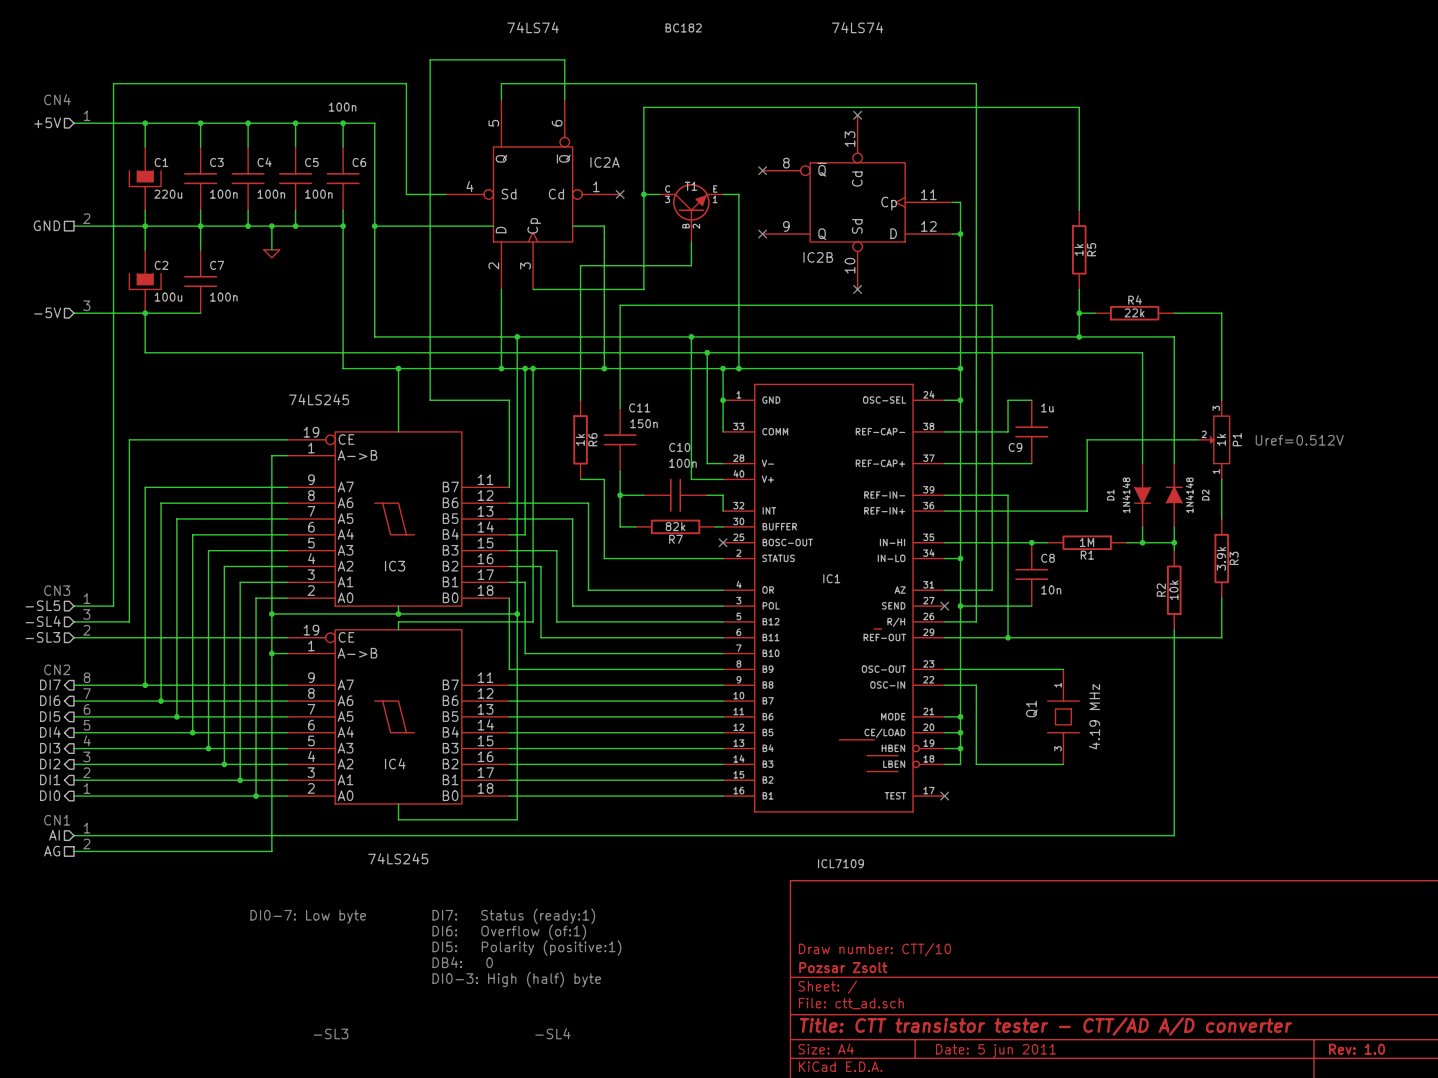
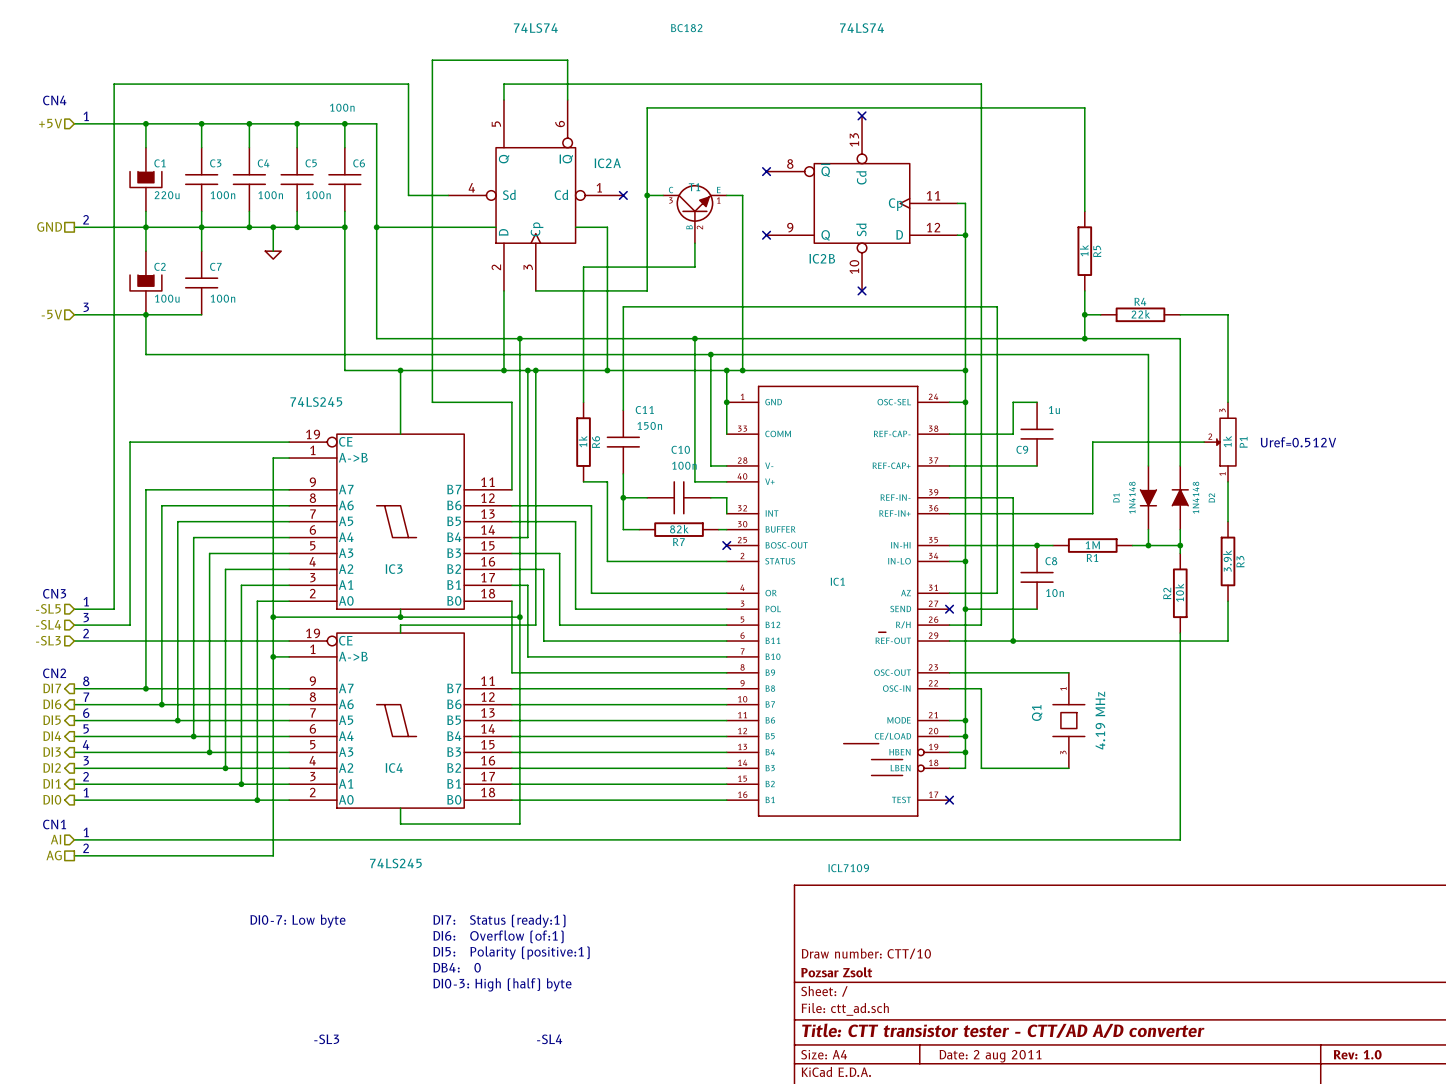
title block: Date: 5 jun 2011 (996, 1050) -> Date: 2 aug 2011 (990, 1056)

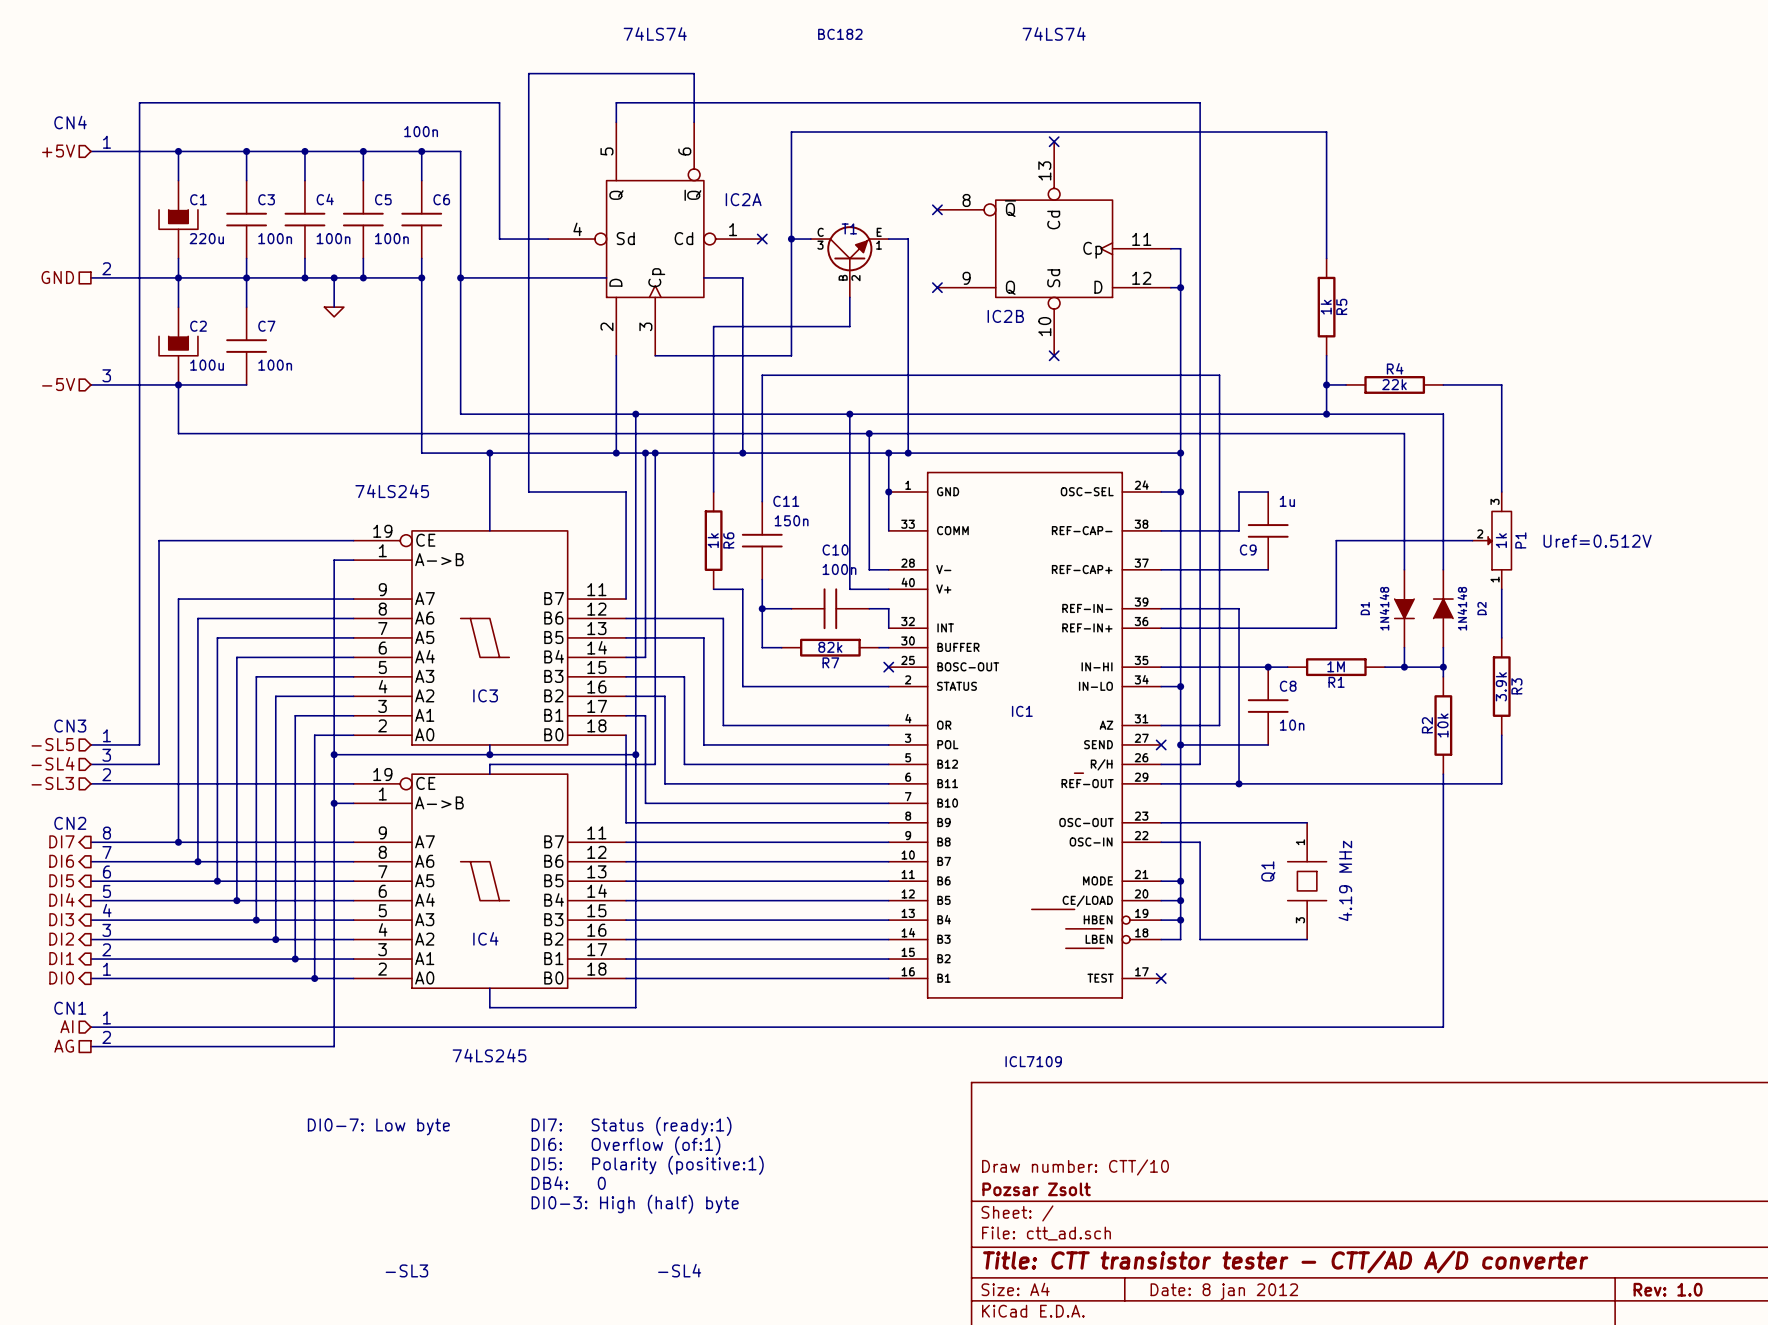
title block: Date: 2 aug 2011 (990, 1056) -> Date: 8 jan 2012 (1224, 1291)

